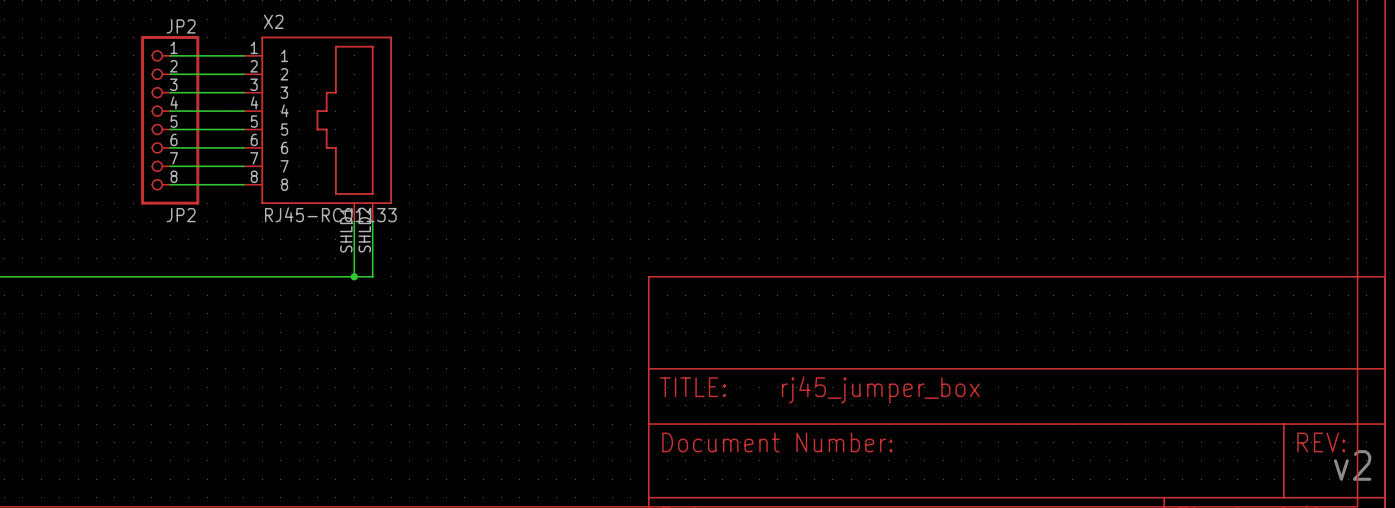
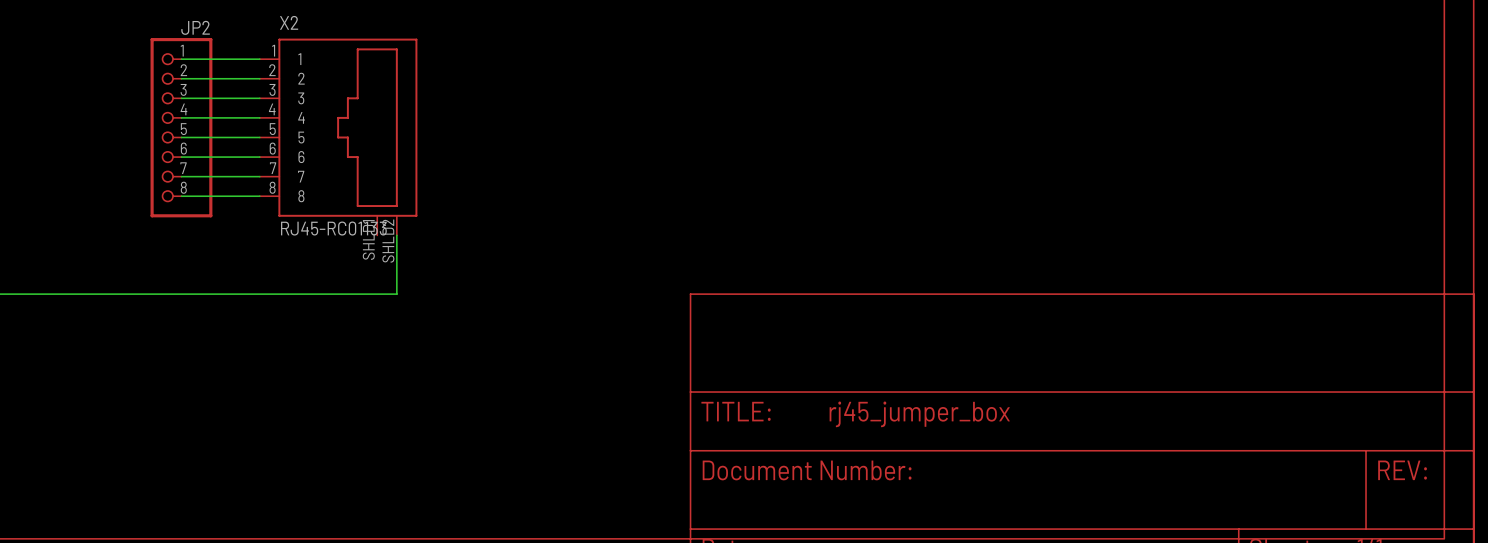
JP2 value: JP2 (181, 215) -> none
wire: (354, 221) (354, 276) -> none
junction: (354, 276) -> none
text: v2 (1352, 465) -> none

